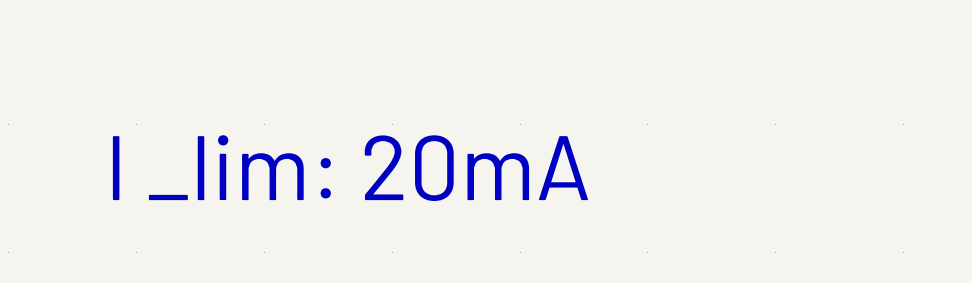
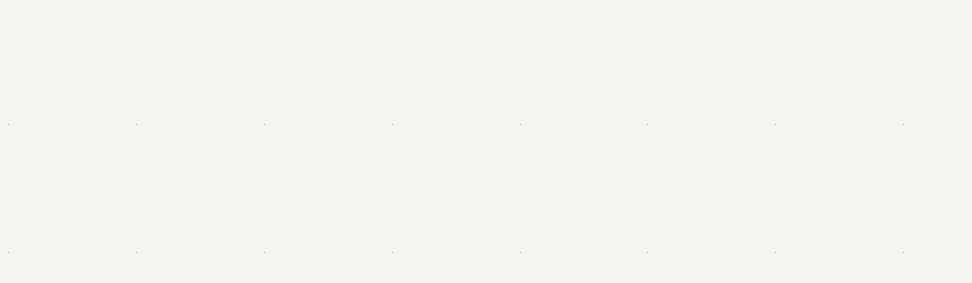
text: I _lim: 20mA (350, 168) -> none

